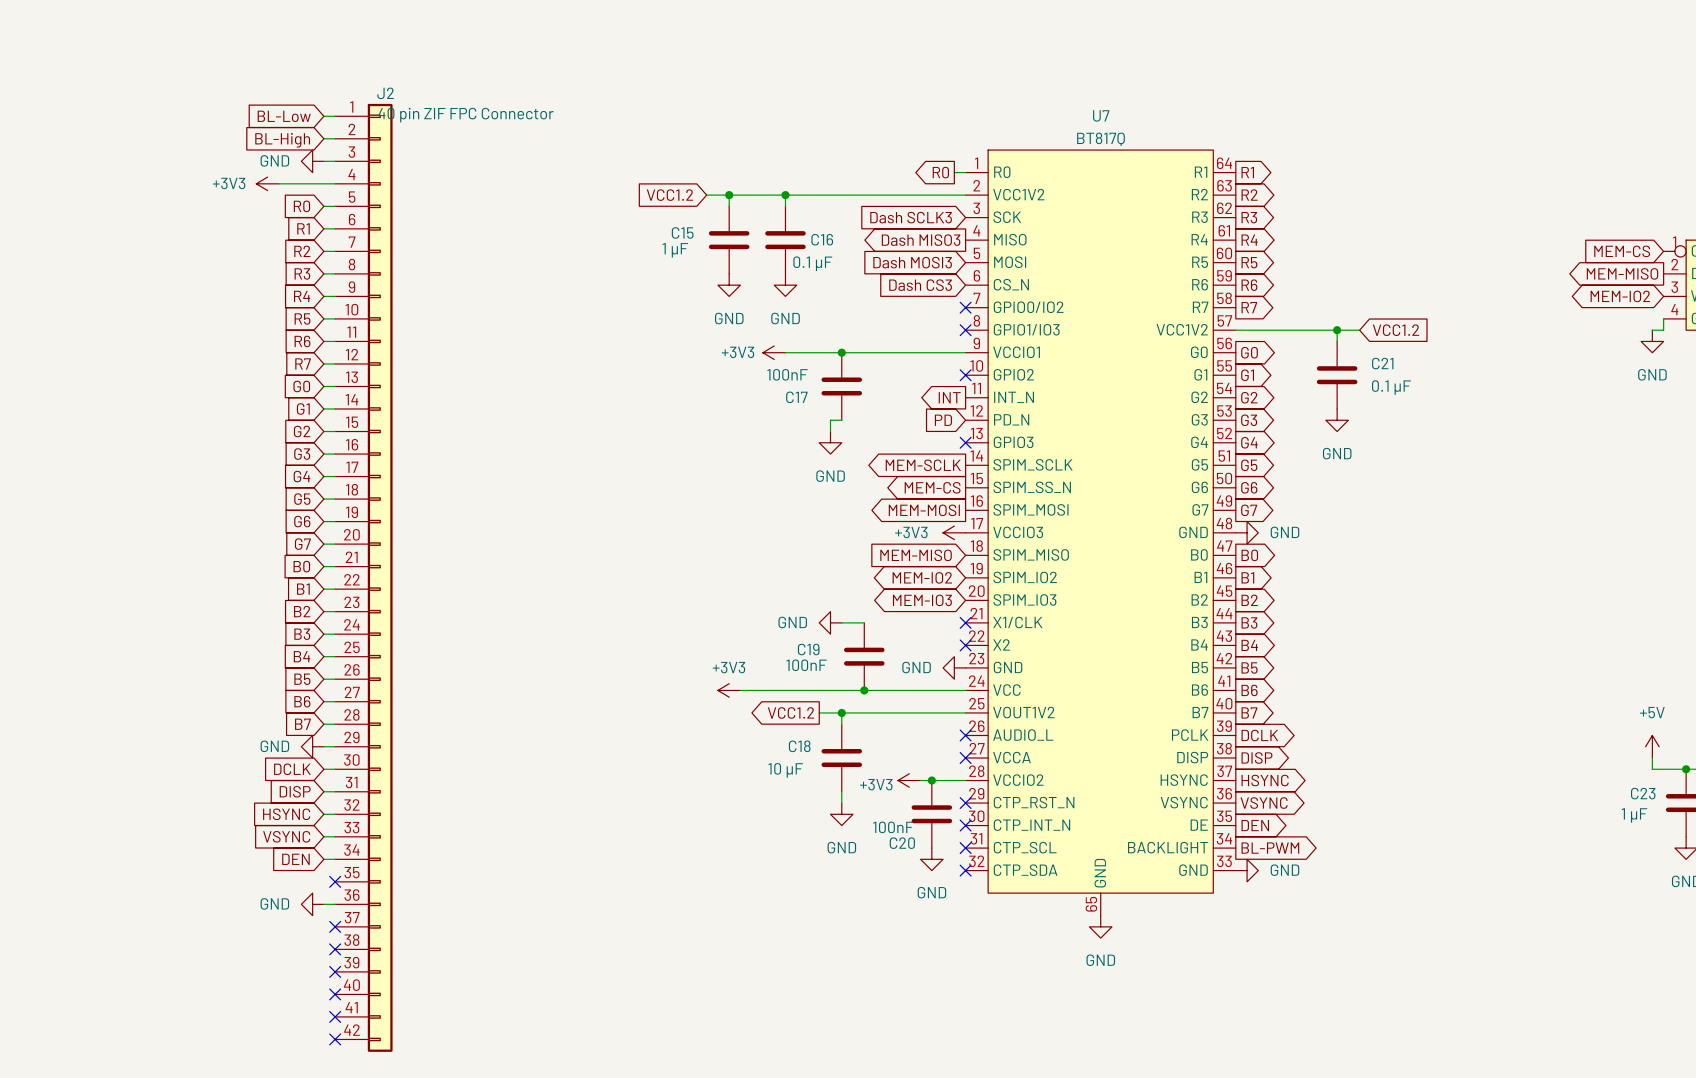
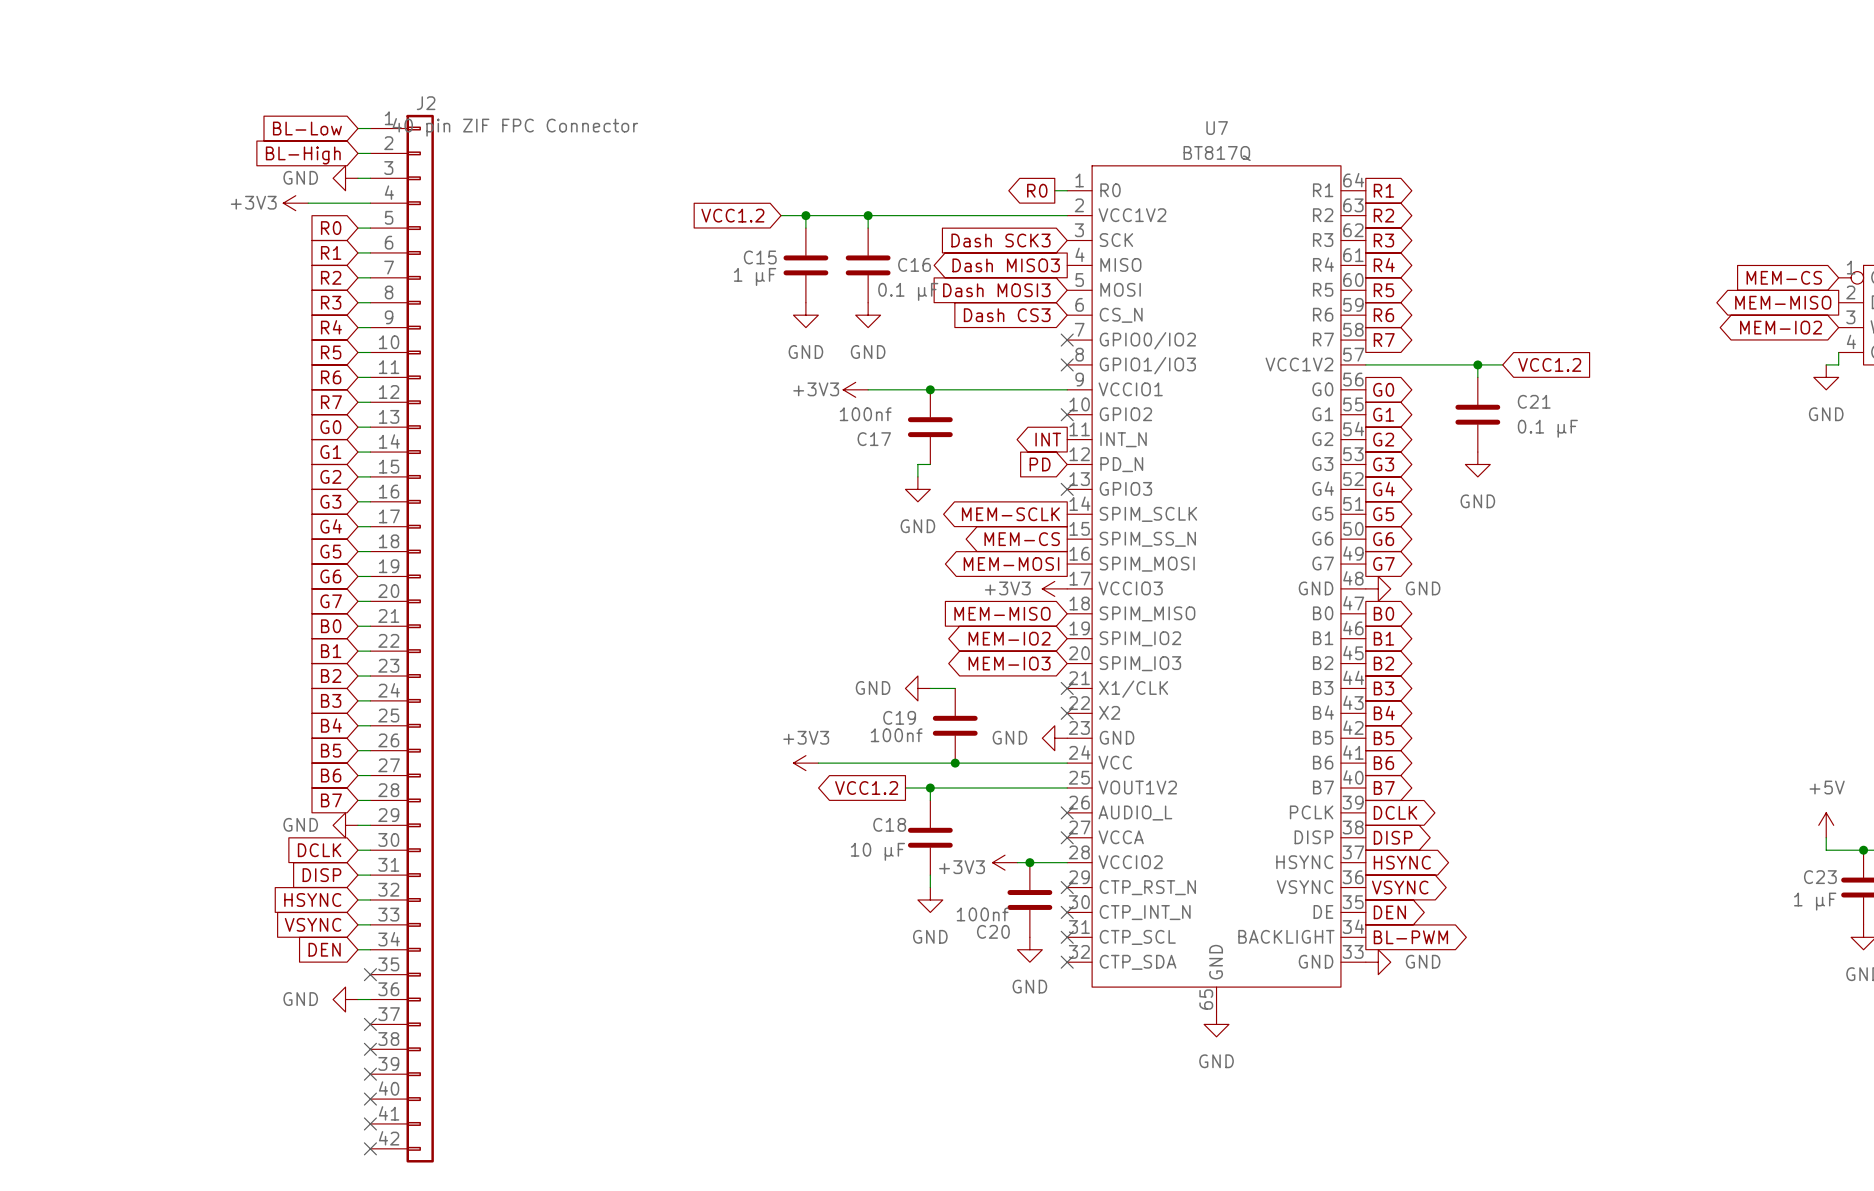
global label: Dash SCLK3 (911, 217) -> Dash SCK3 (1000, 240)
C17 value: 100nF (787, 374) -> 100nf (865, 414)
C19 value: 100nF (806, 665) -> 100nf (896, 735)
C20 value: 100nF (893, 827) -> 100nf (982, 914)

